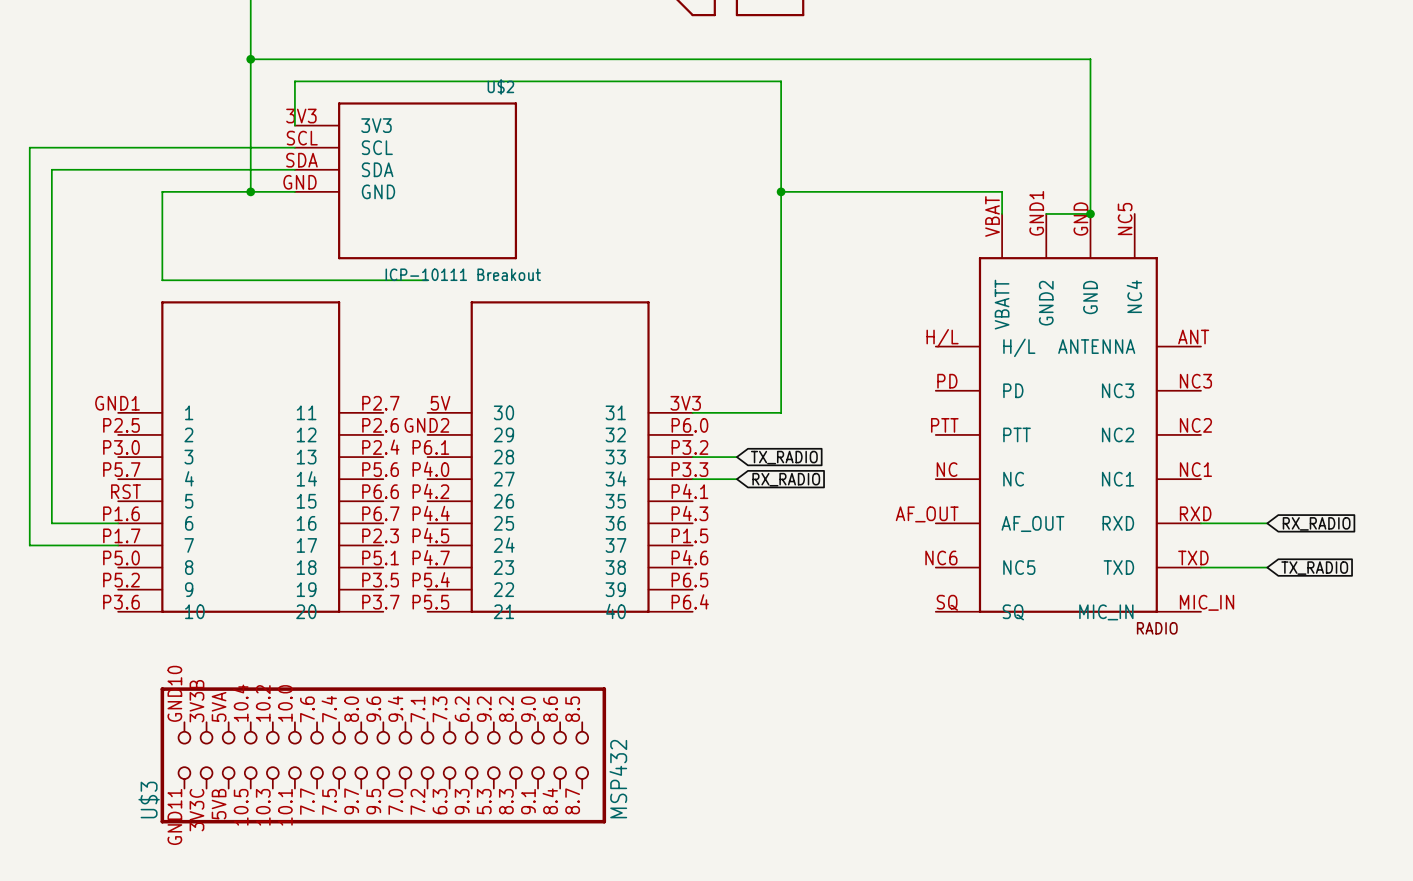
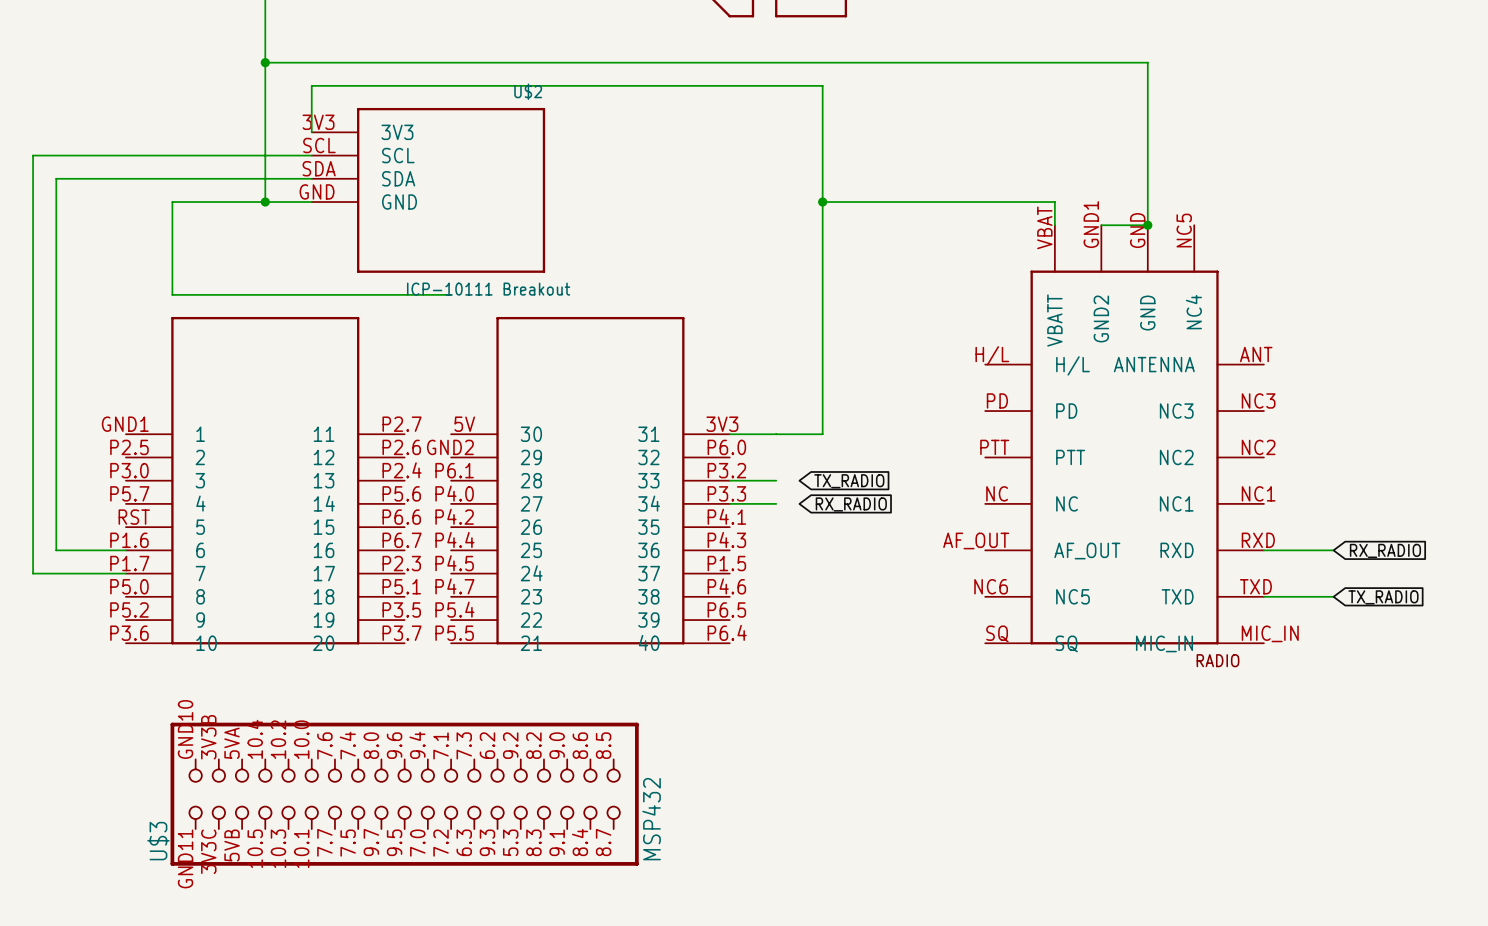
global label position: TX_RADIO (784, 457) -> TX_RADIO (849, 481)
global label position: RX_RADIO (786, 479) -> RX_RADIO (851, 504)

